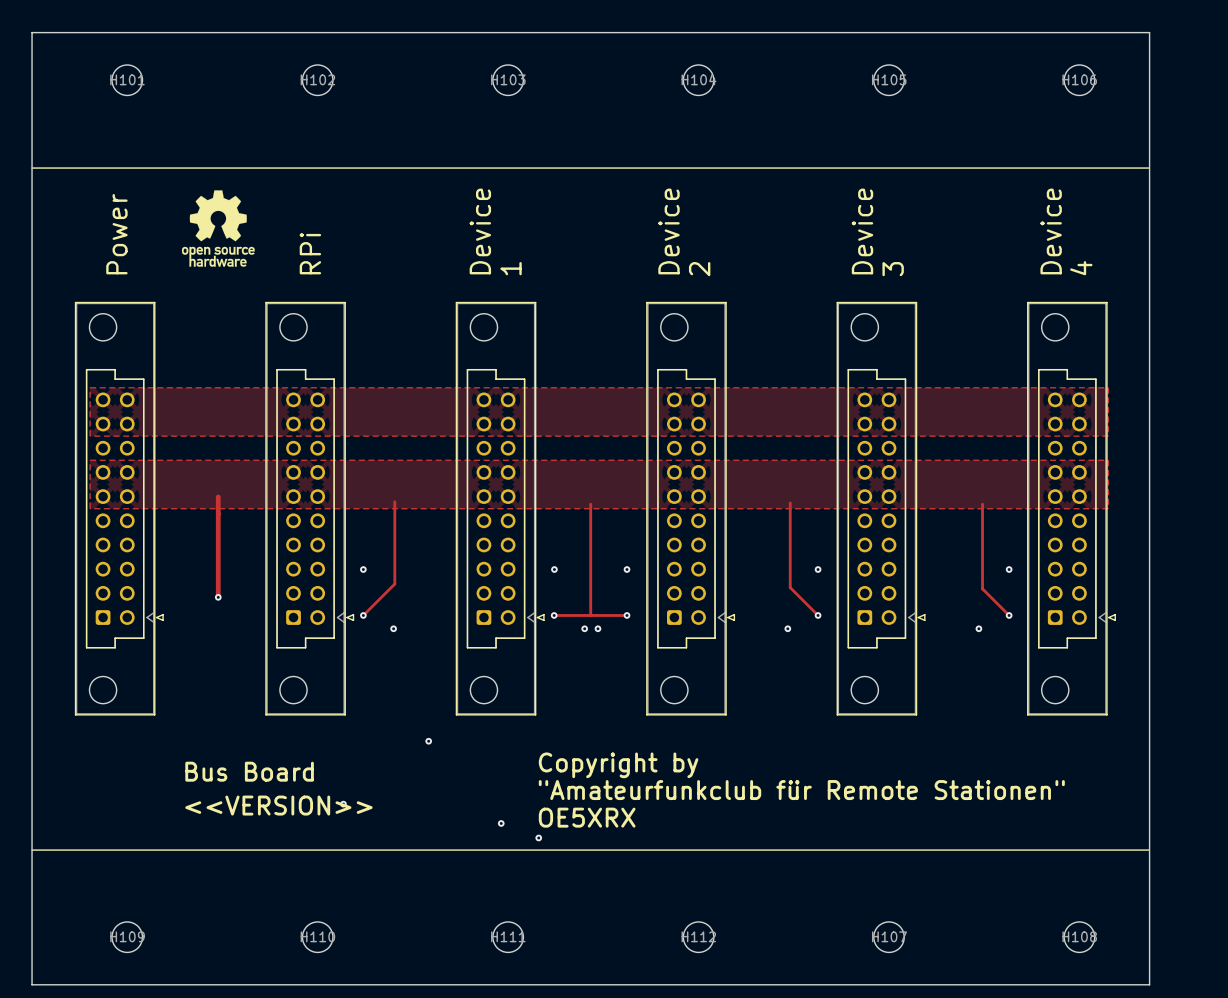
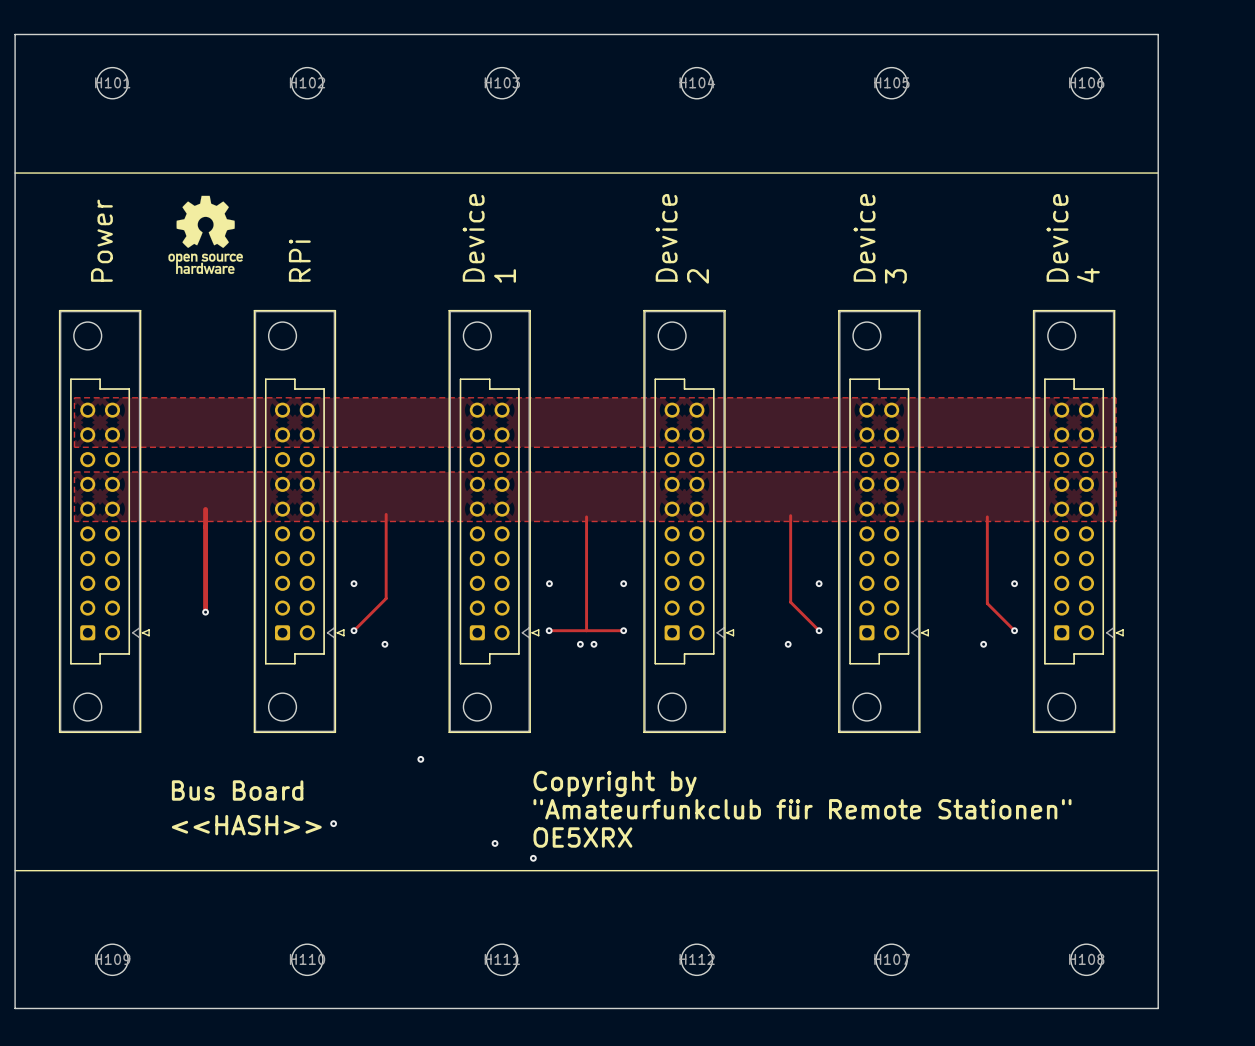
text: <<VERSION>> (278, 805) -> <<HASH>> (246, 825)

